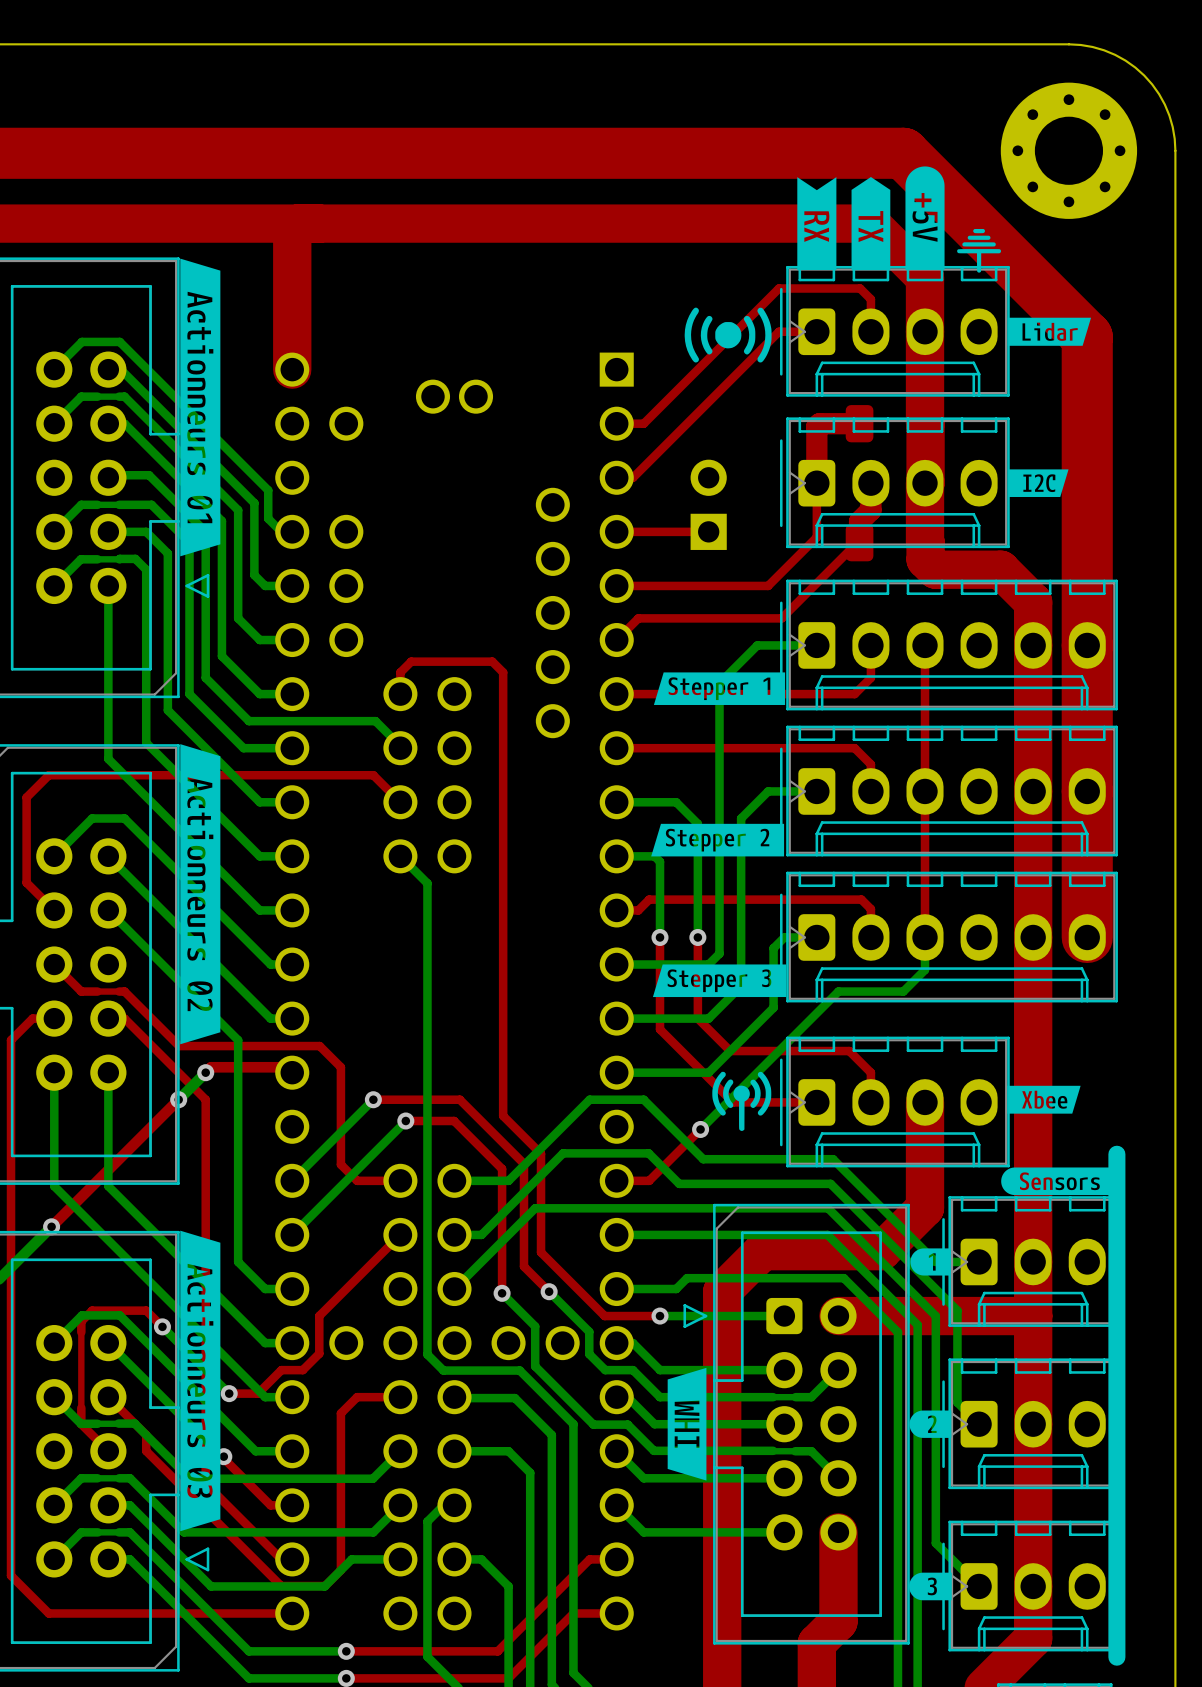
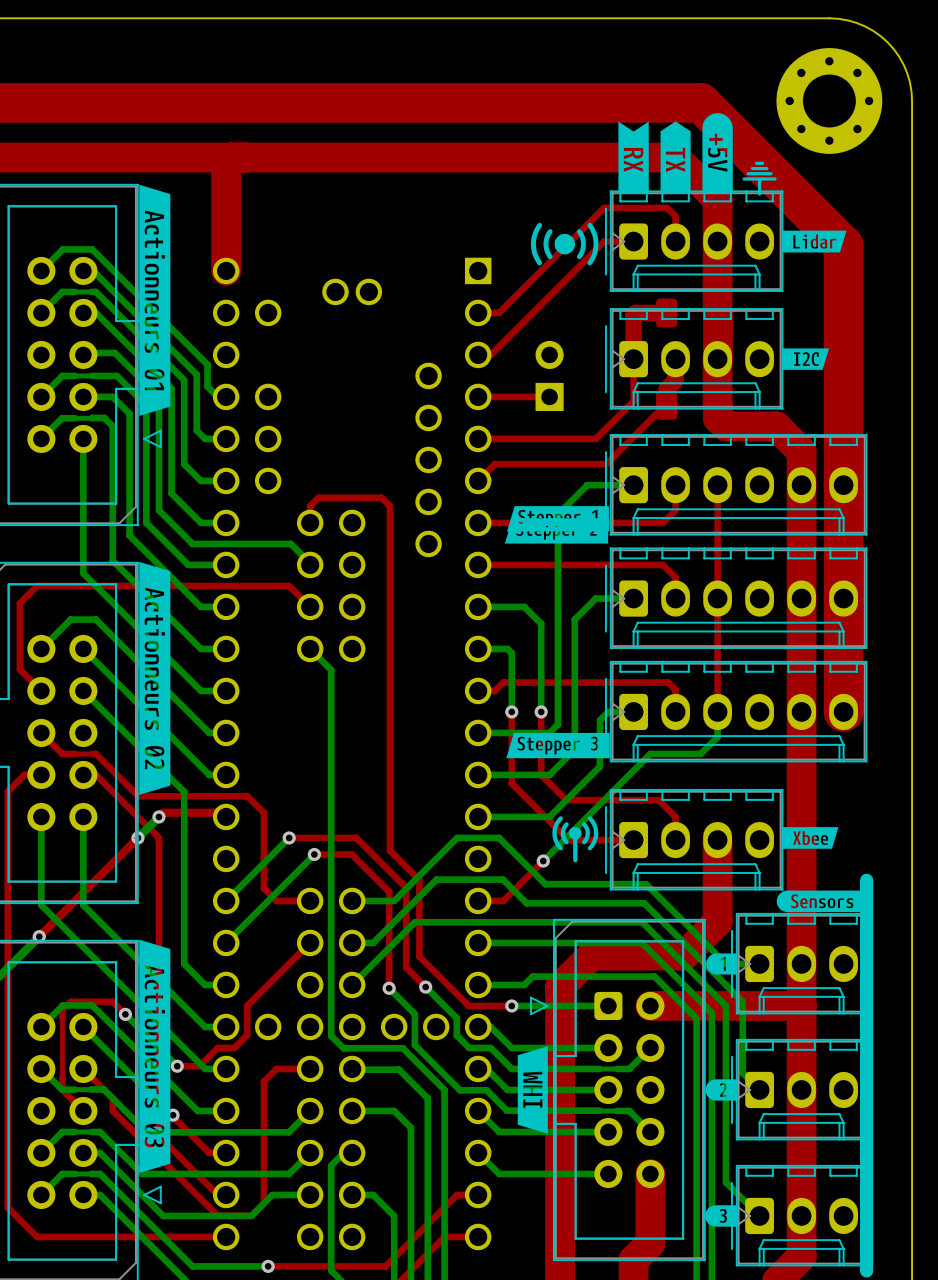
drawing position: (717, 840) -> (556, 530)

